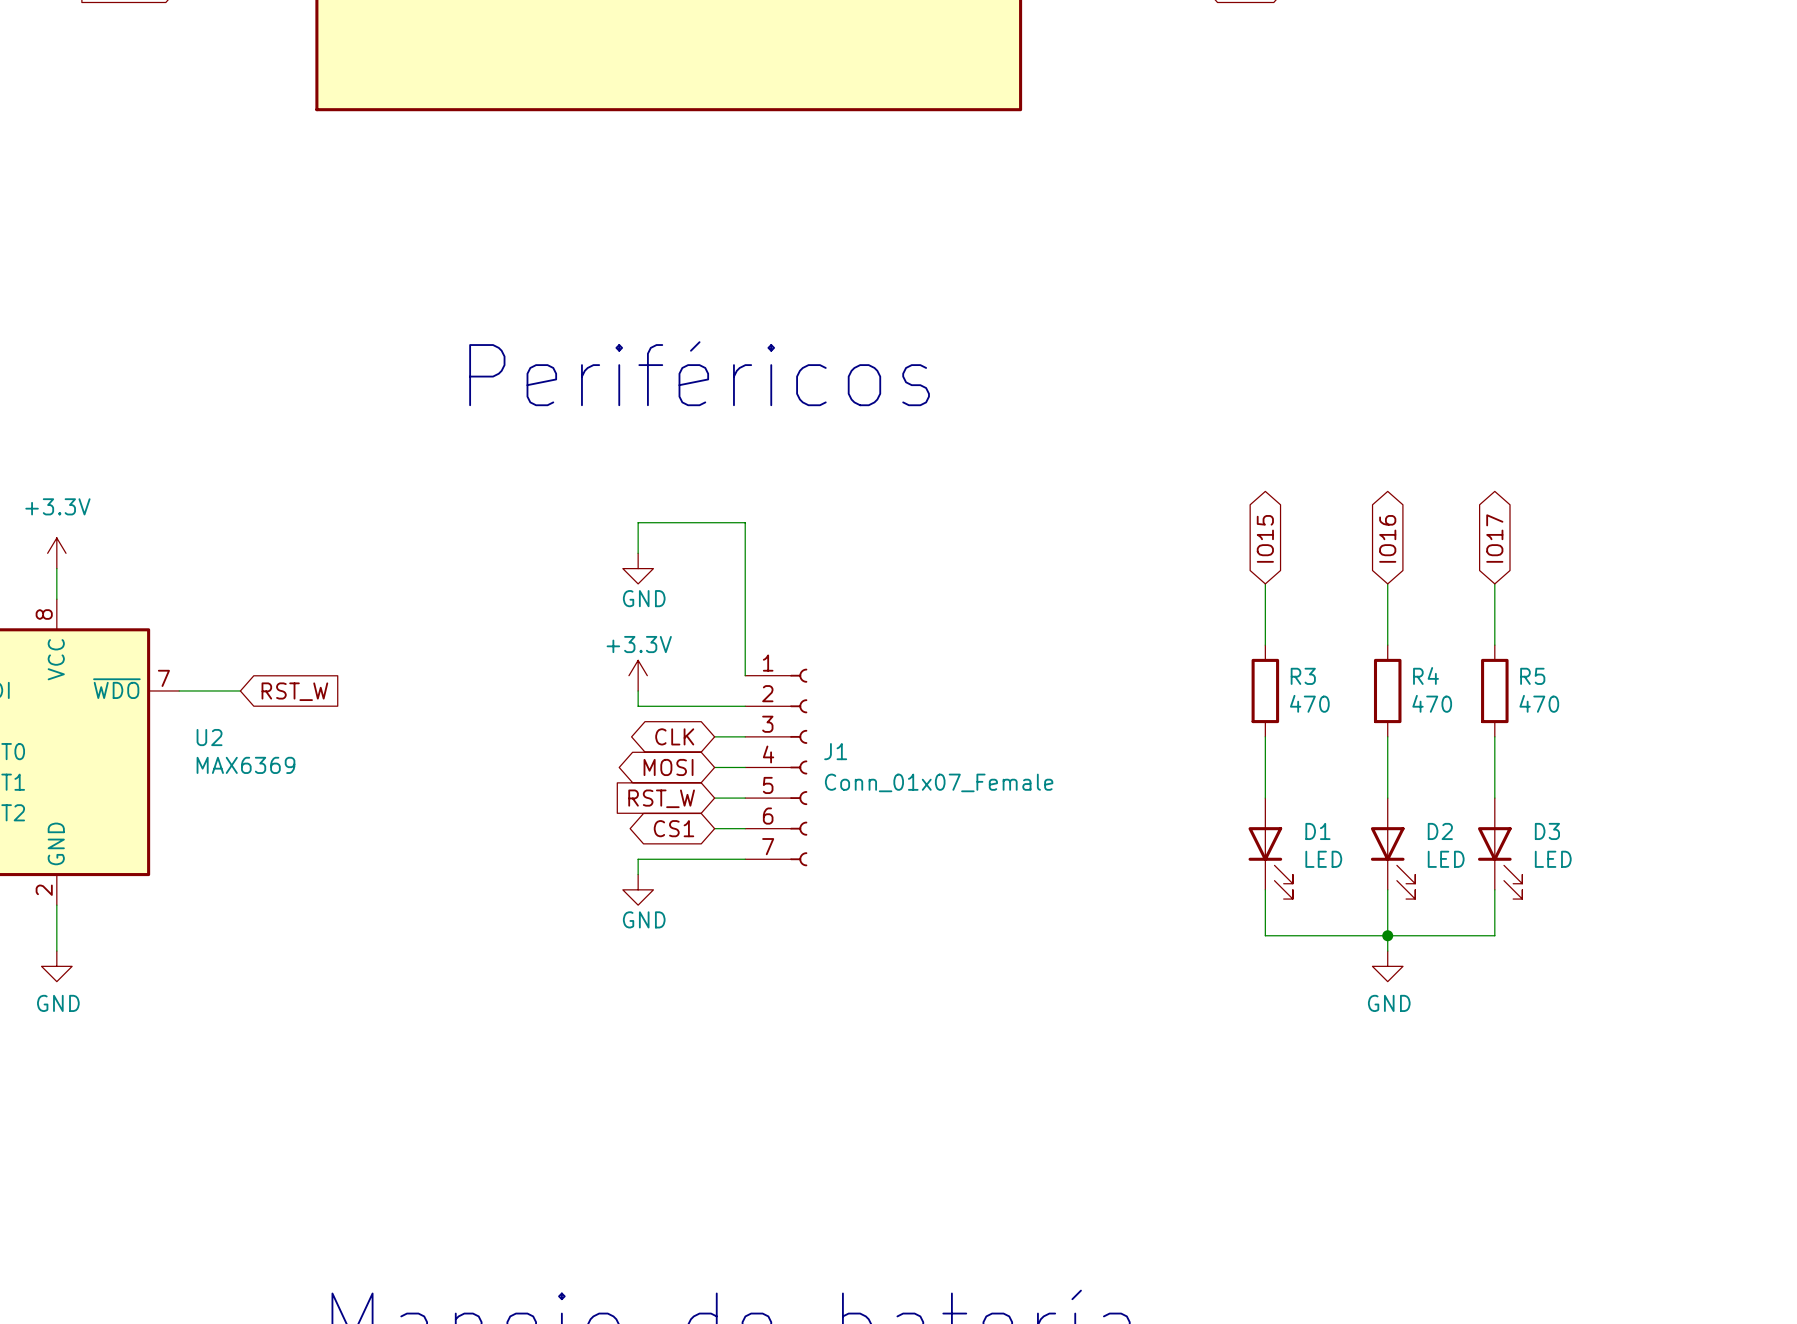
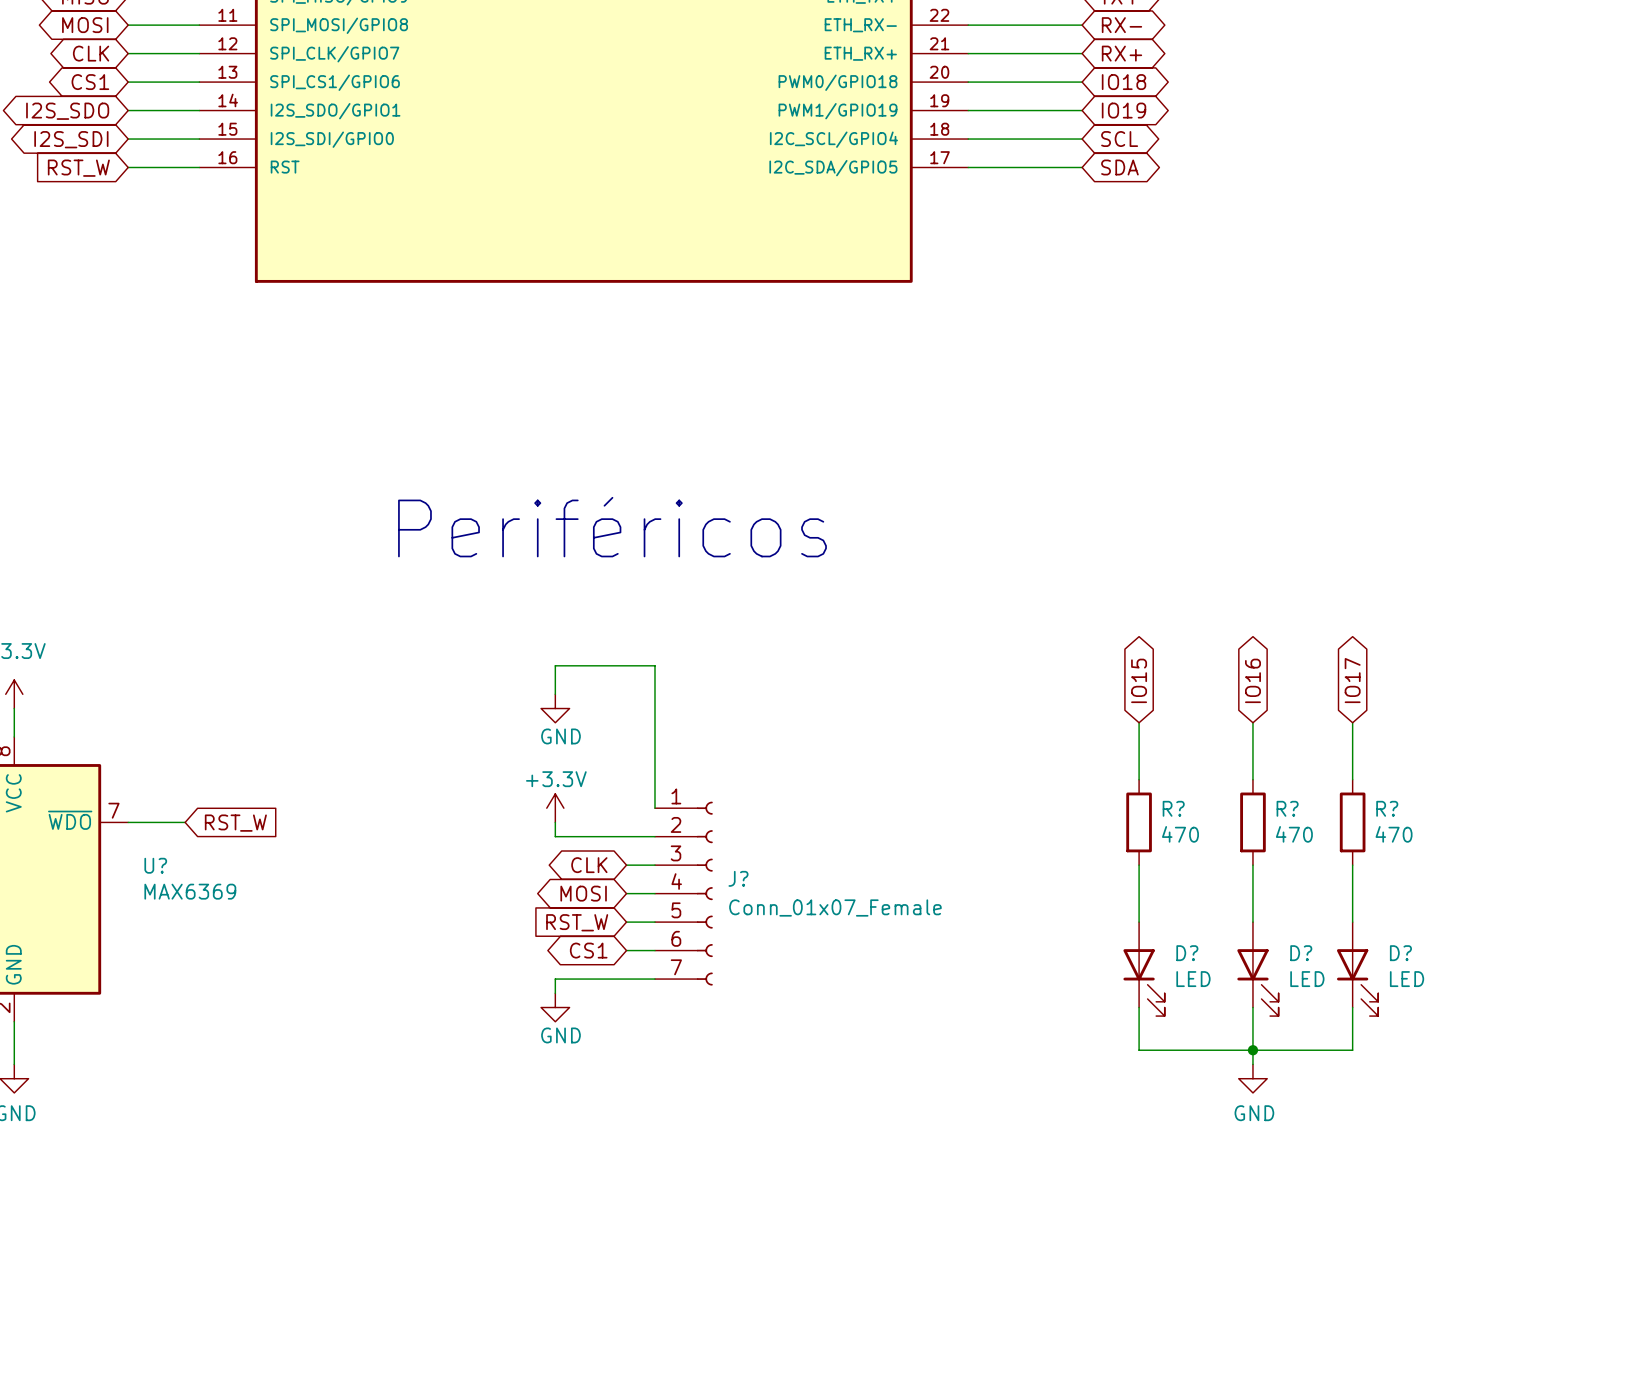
R4 name: R4 (1426, 675) -> R? (1287, 808)
R3 name: R3 (1303, 676) -> R? (1173, 808)
R5 name: R5 (1532, 676) -> R? (1387, 808)
U2 name: U2 (209, 737) -> U? (155, 865)
J1 name: J1 (835, 751) -> J? (738, 878)
D1 name: D1 (1317, 831) -> D? (1187, 953)
D2 name: D2 (1440, 831) -> D? (1301, 953)
D3 name: D3 (1547, 831) -> D? (1400, 953)

